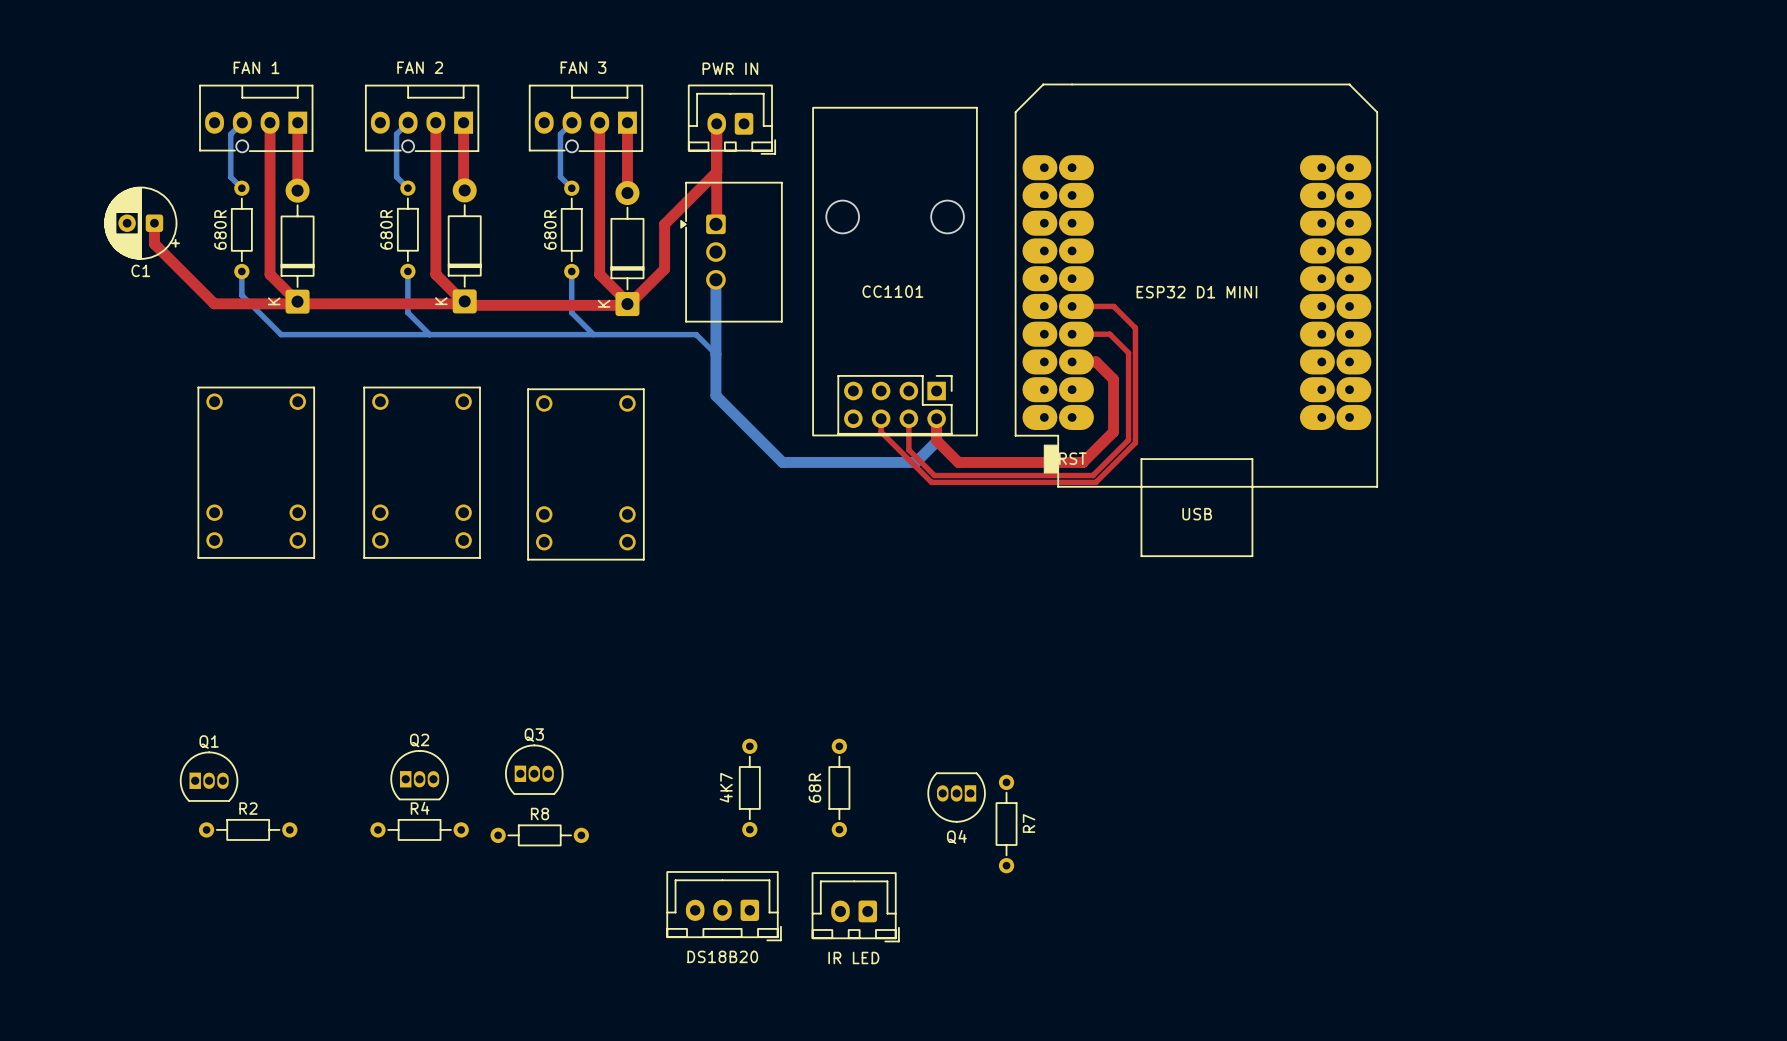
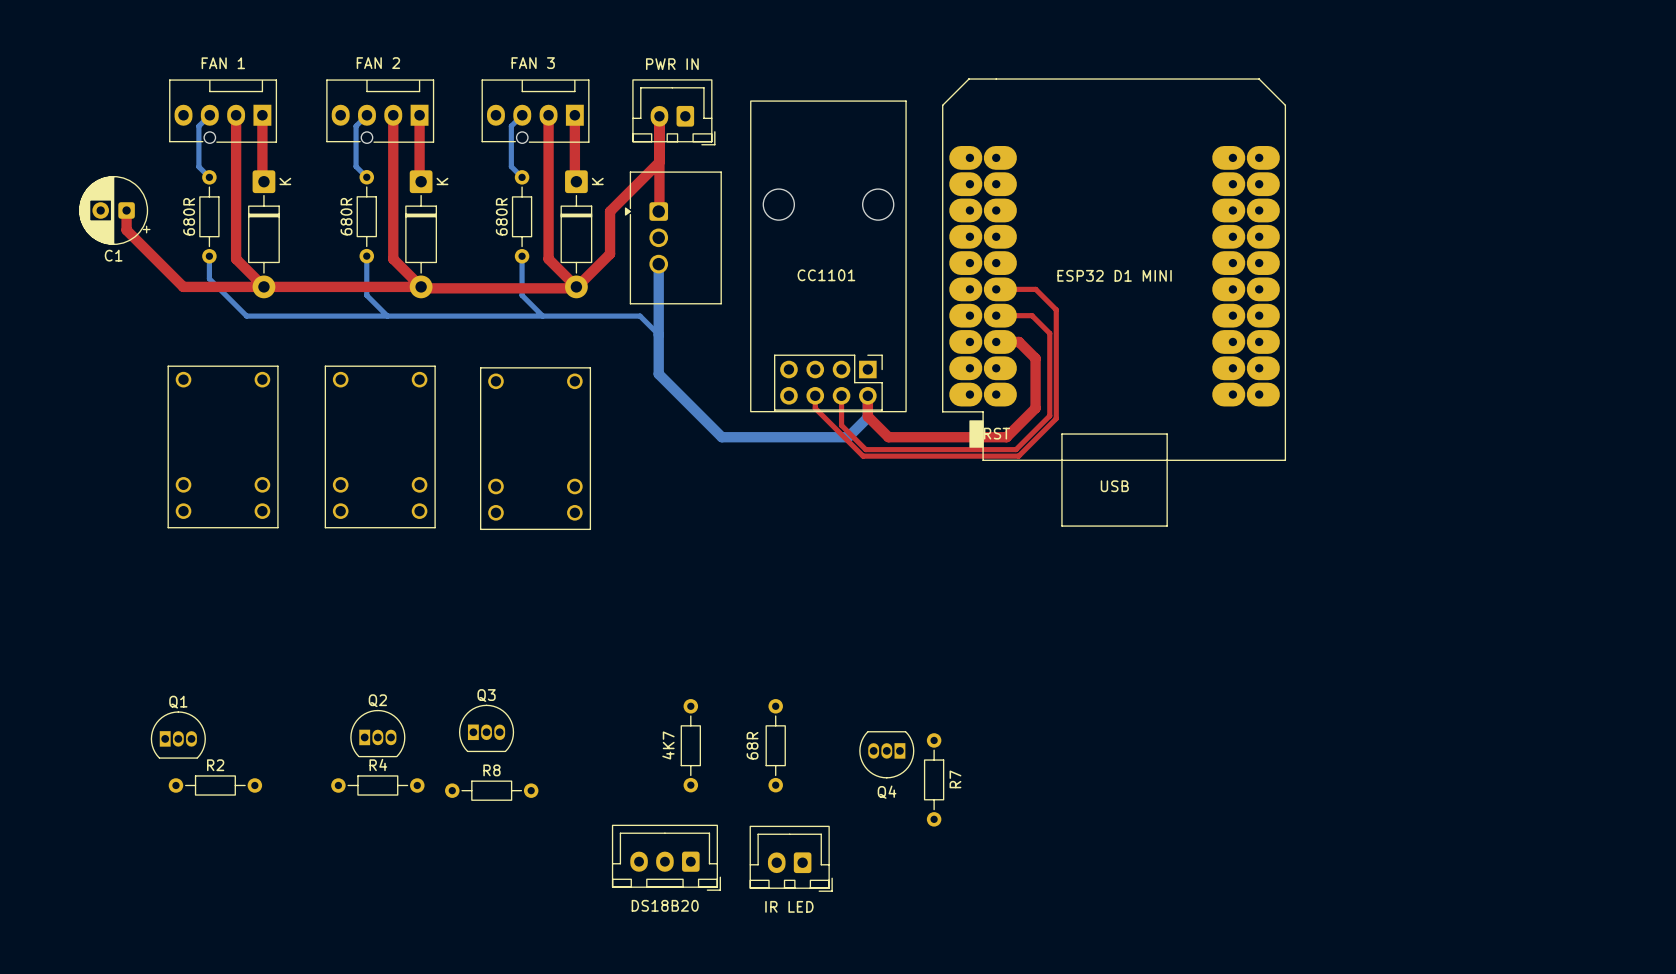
part rotation: 0° (464, 245) -> 180° (421, 234)
part rotation: 0° (297, 246) -> 180° (263, 234)
part rotation: 0° (627, 248) -> 180° (576, 234)

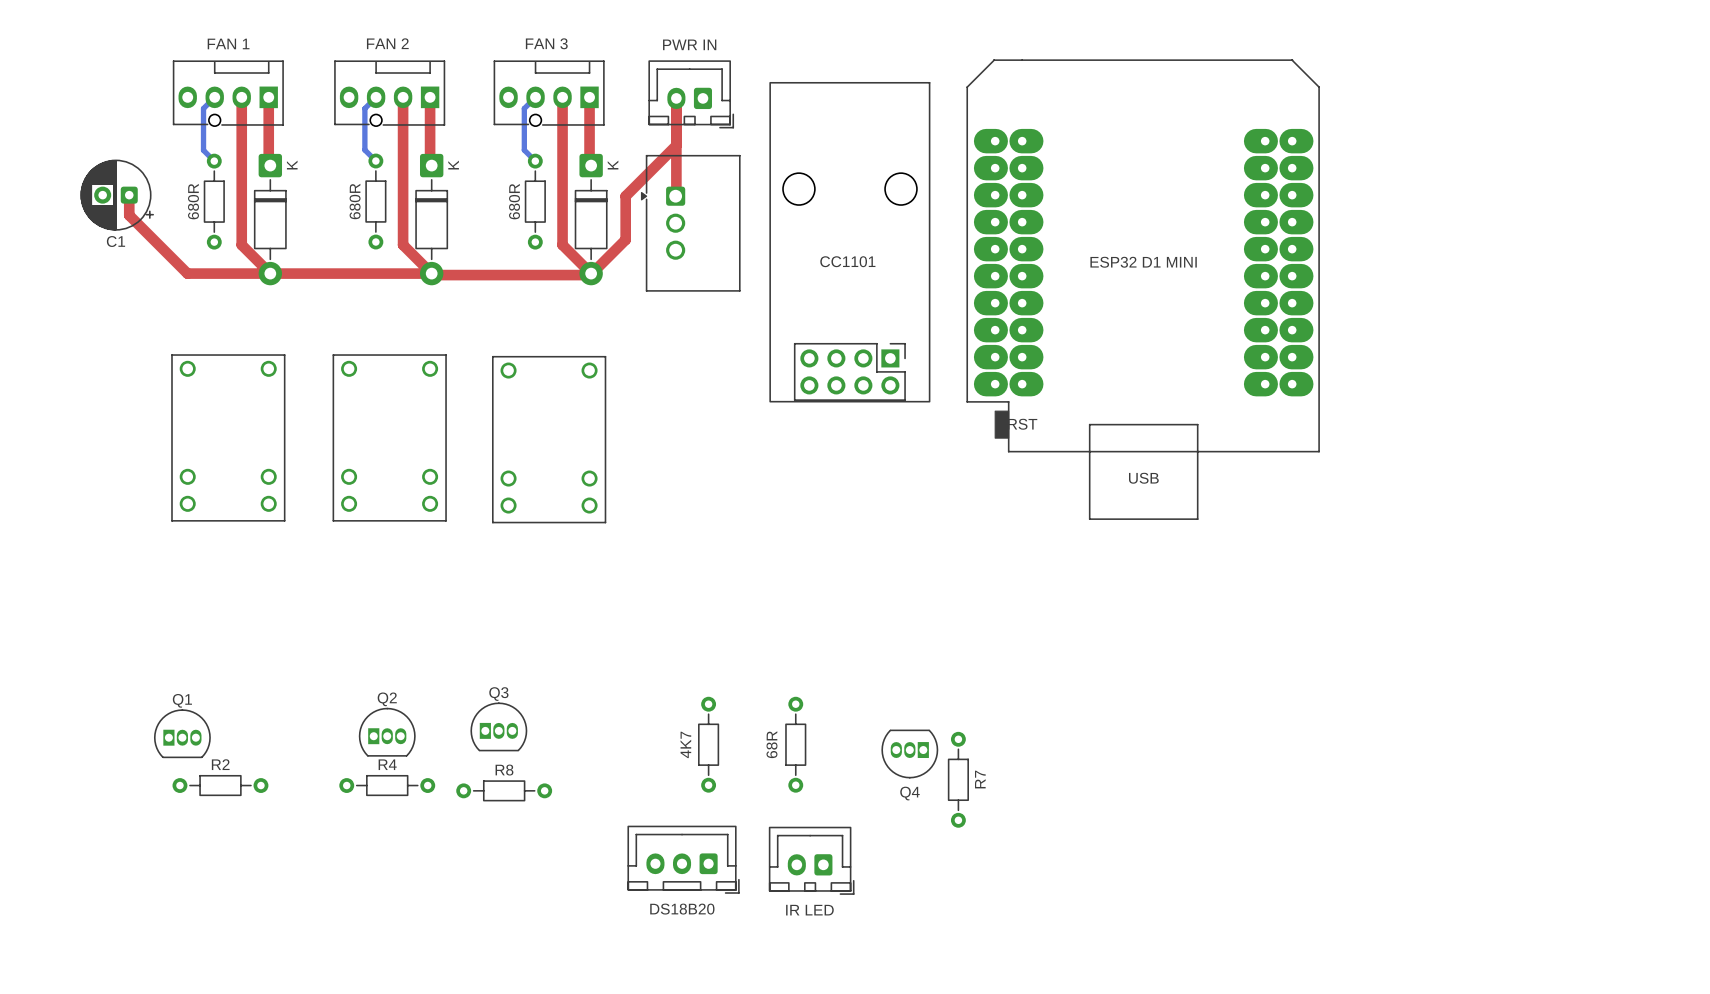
bottom track: (209, 256) (209, 278) (246, 316) (640, 316) (658, 334) -> none
bottom track: (366, 256) (366, 295) (387, 316) -> none
bottom track: (522, 256) (522, 295) (542, 316) -> none
bottom track: (658, 264) (658, 374) (721, 437) (848, 437) (867, 417) (867, 395) -> none
top track: (996, 289) (1035, 289) (1056, 309) (1056, 418) (1018, 456) (863, 456) (815, 408) (815, 395) -> none
top track: (996, 315) (1032, 315) (1049, 333) (1049, 415) (1016, 449) (865, 449) (841, 425) (841, 395) -> none
top track: (996, 341) (1019, 341) (1035, 358) (1035, 408) (1006, 437) (888, 437) (867, 416) (867, 395) -> none

